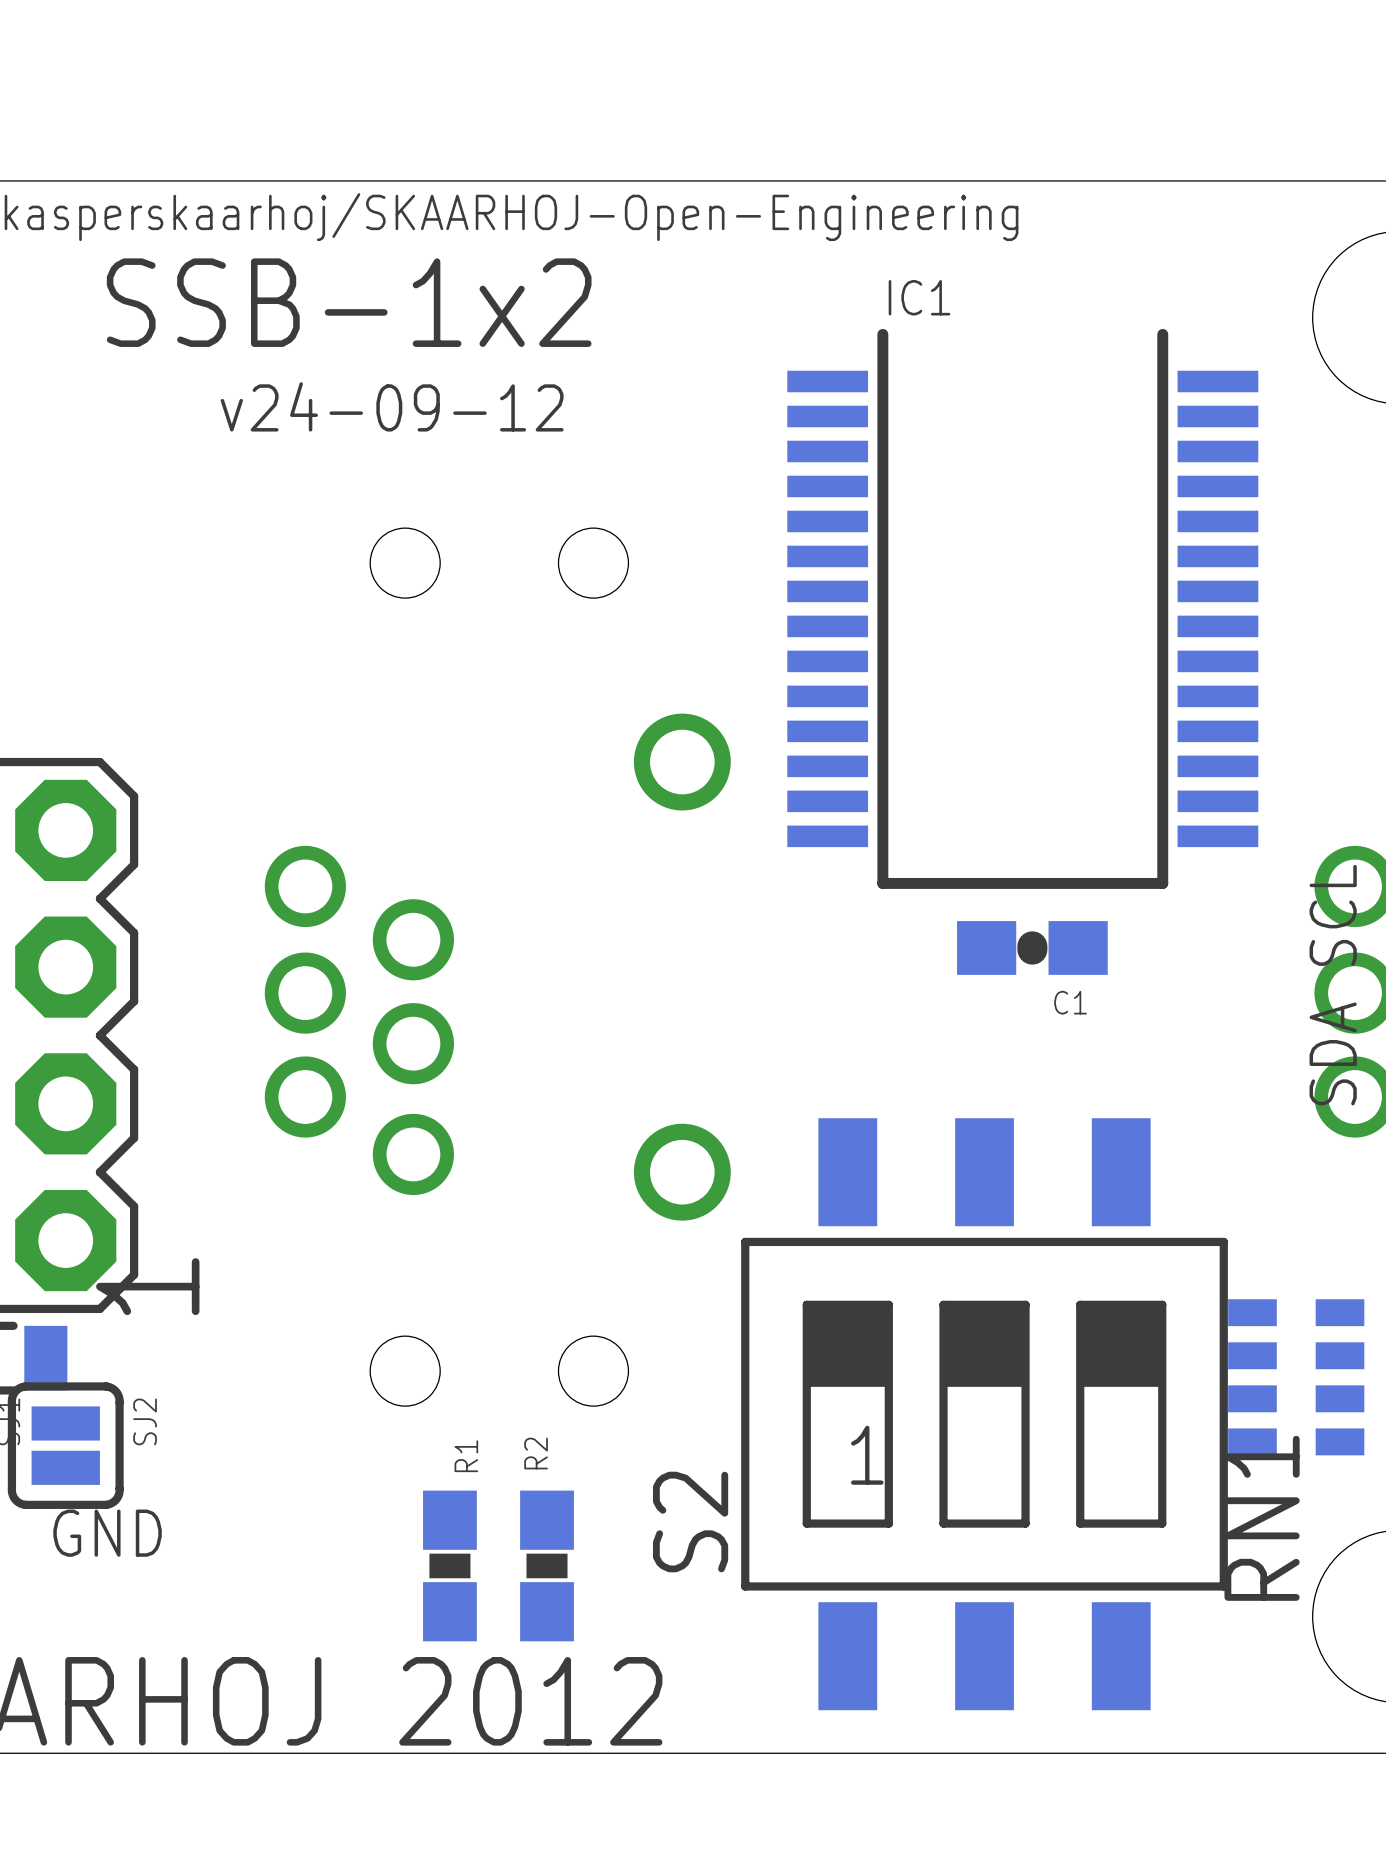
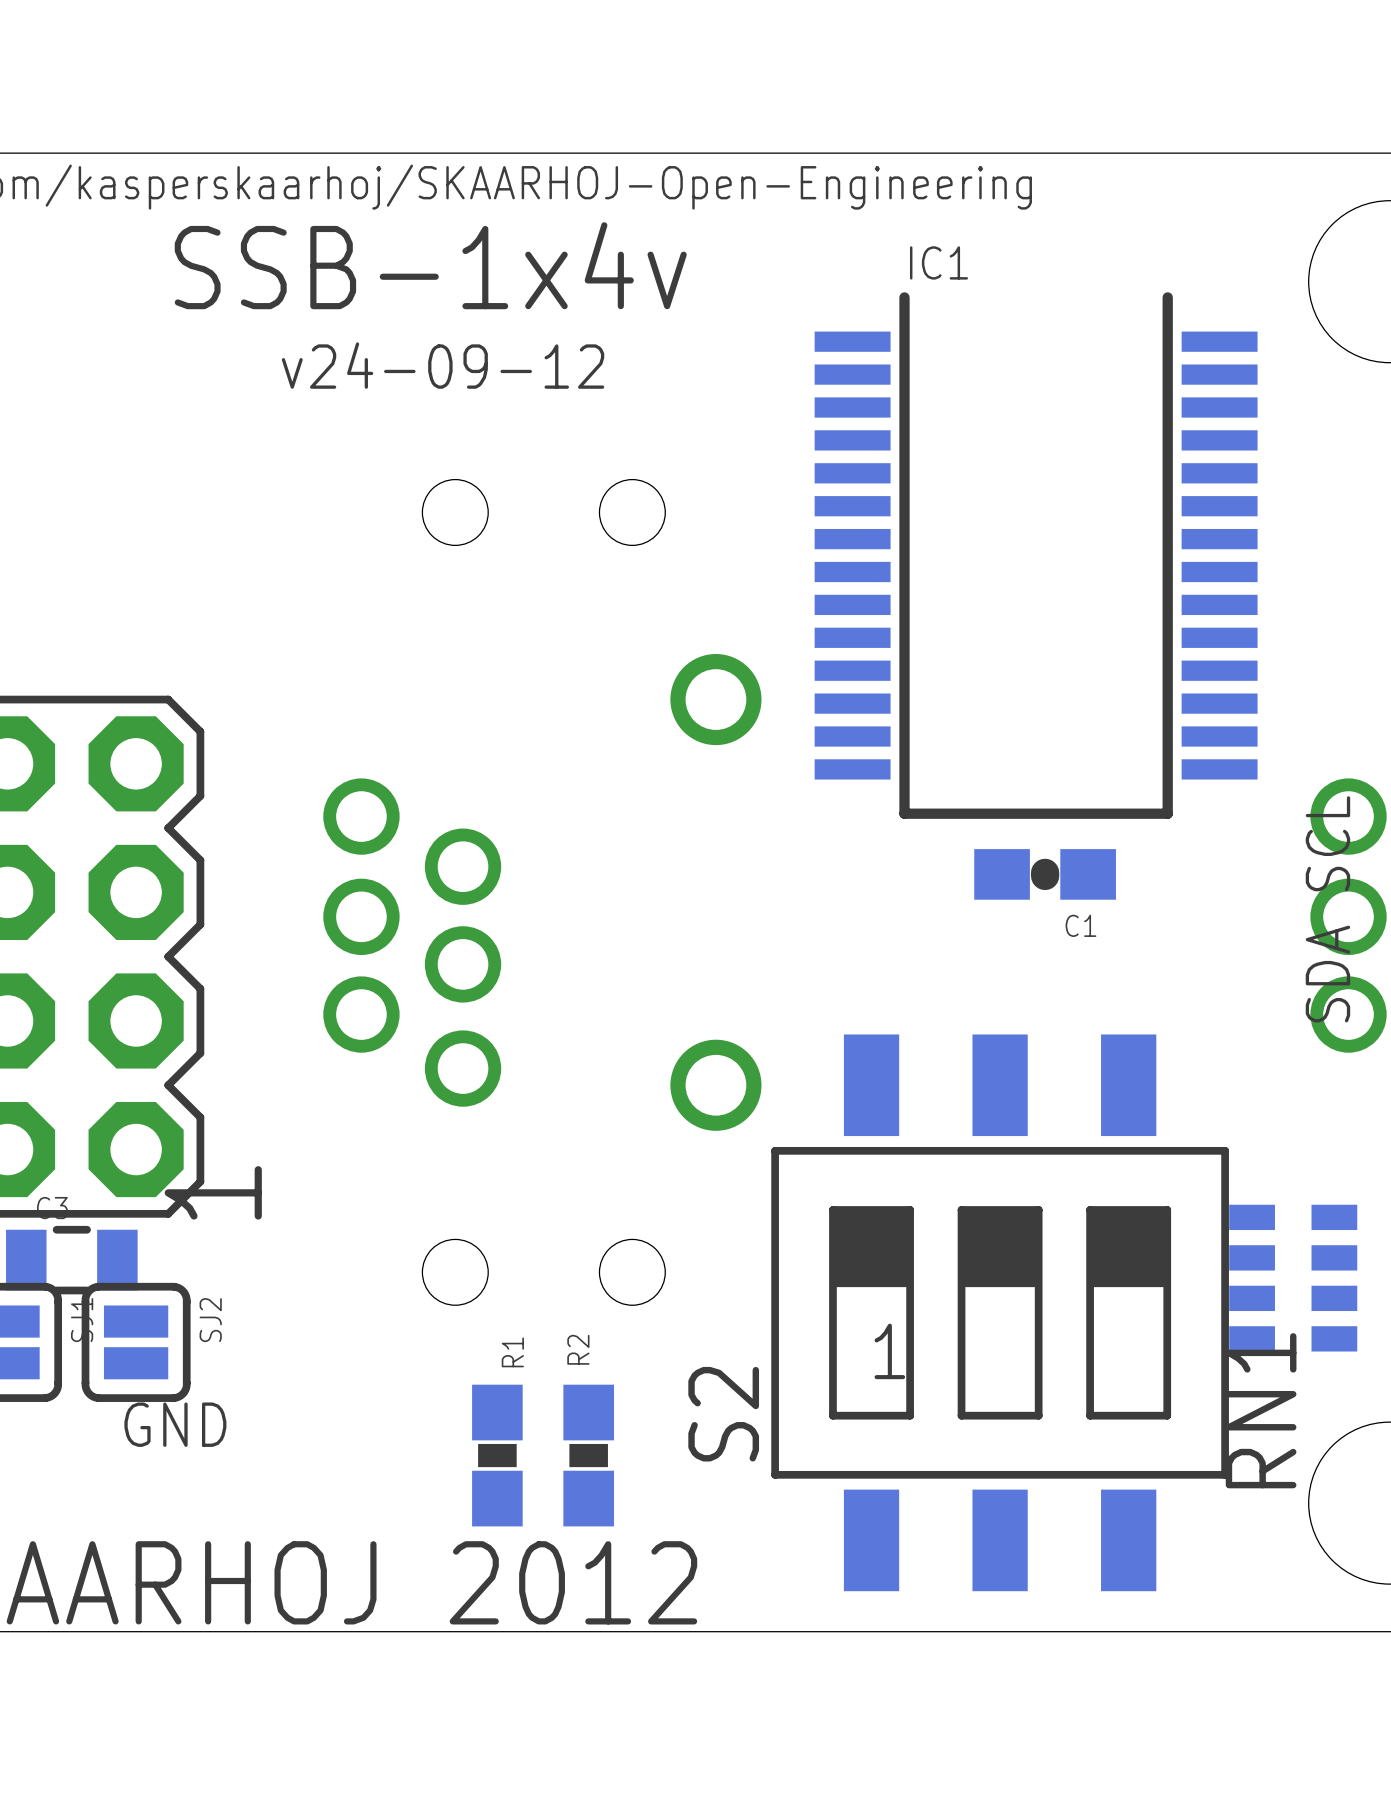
text: SSB-1x2 (349, 302) -> SSB-1x4v (430, 265)

